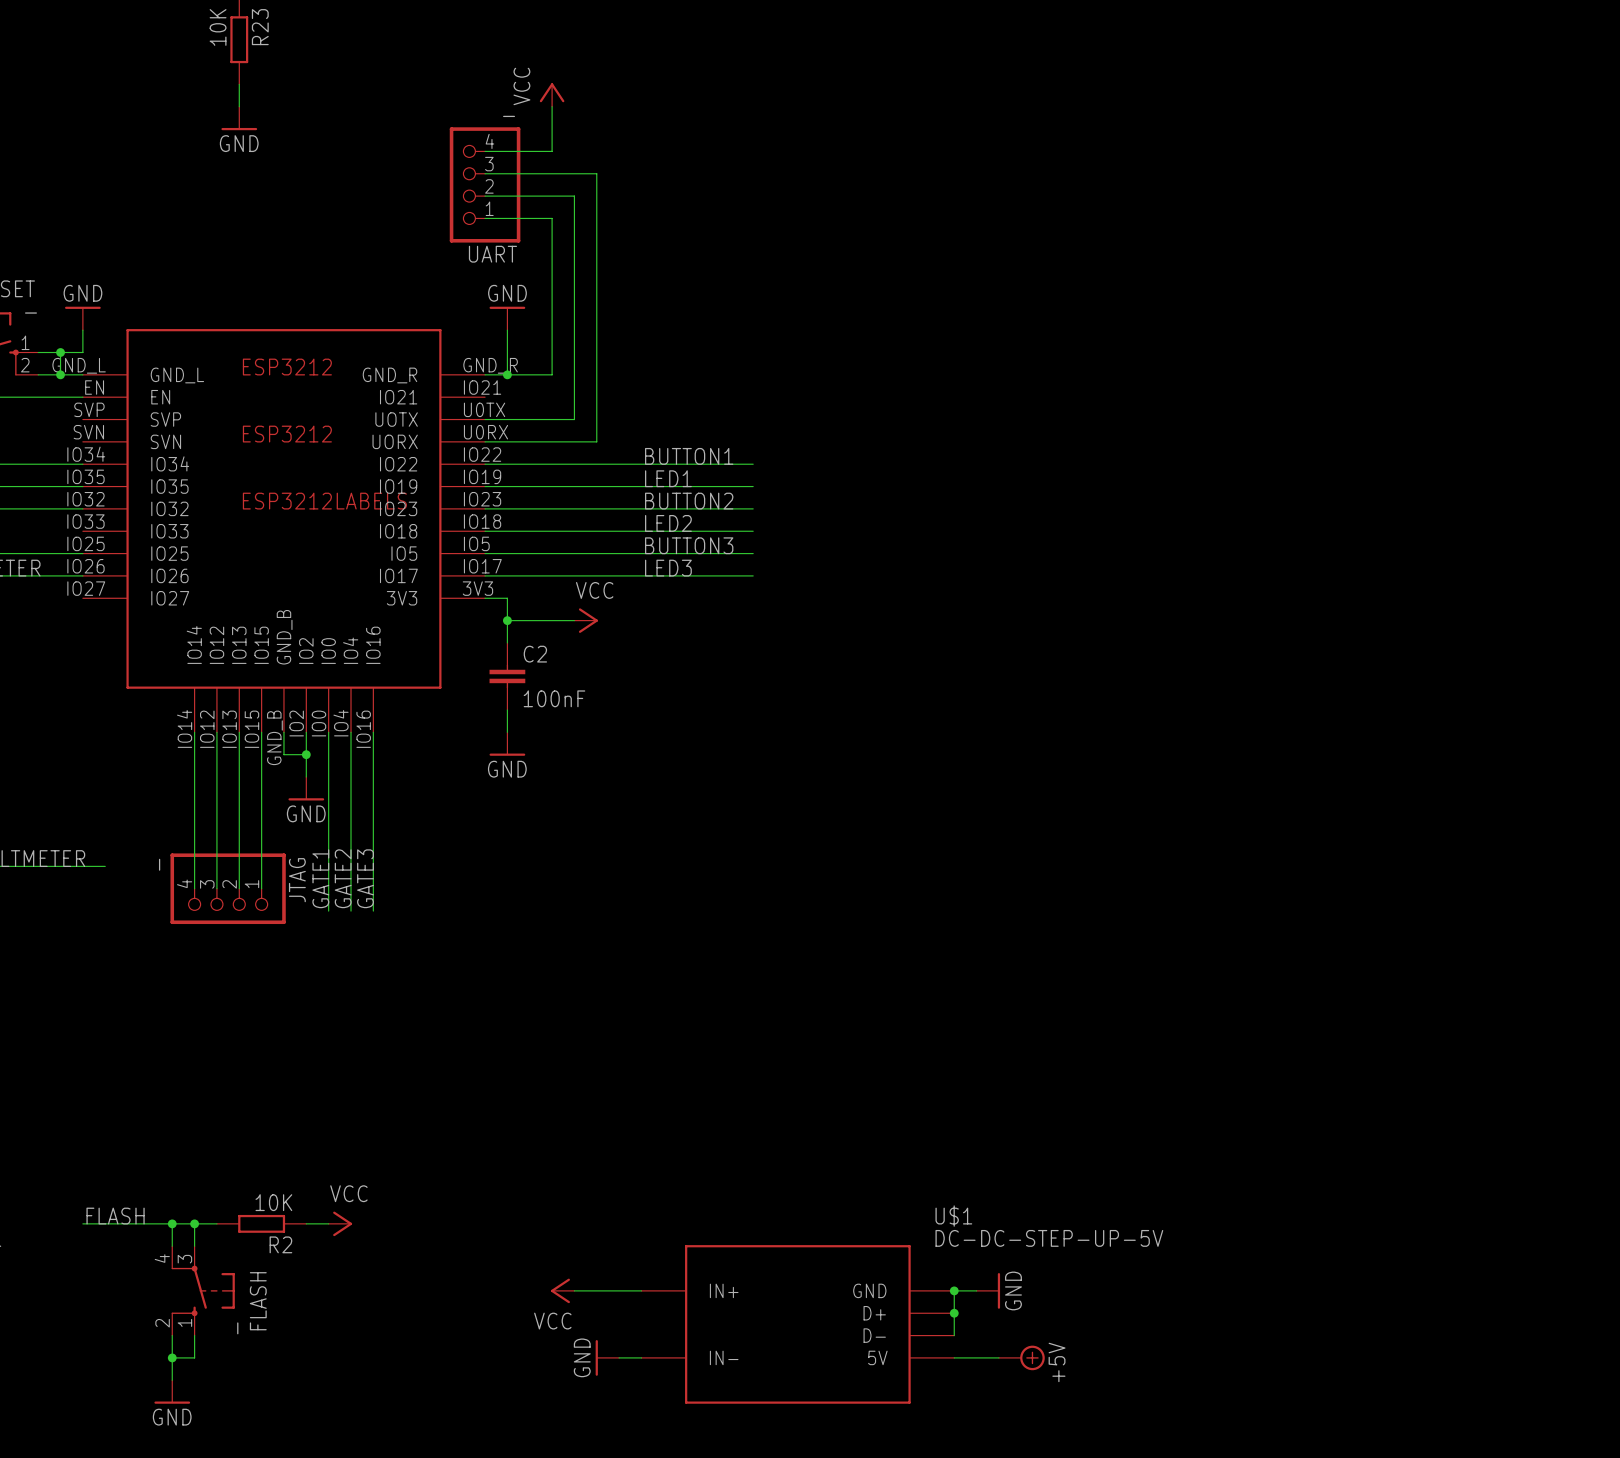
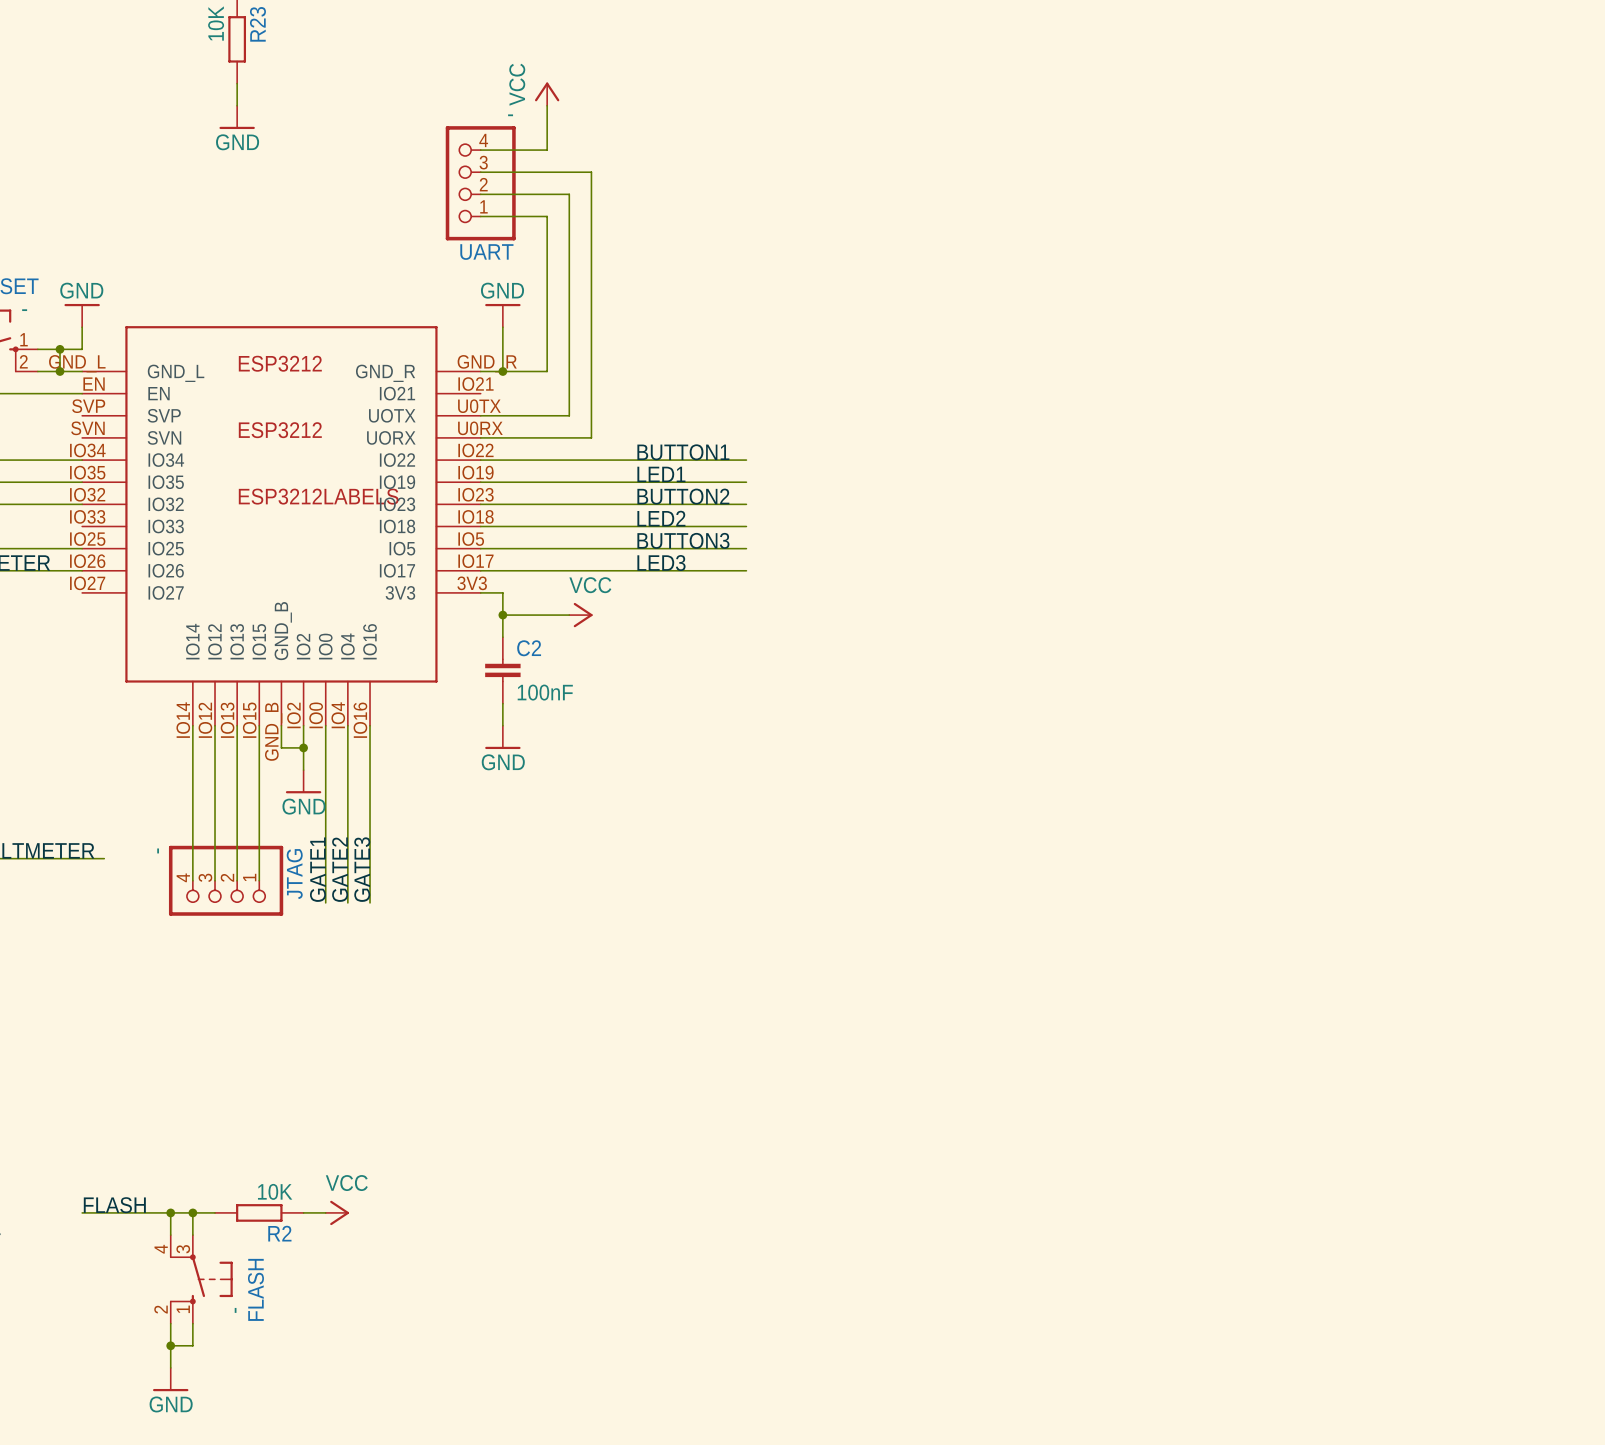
power symbol: VCC (562, 1290) -> none
wire: (574, 1290) (641, 1290) -> none
junction: (954, 1290) -> none
wire: (976, 1290) (954, 1290) (954, 1335) -> none
power symbol: GND (988, 1290) -> none
junction: (954, 1313) -> none
U$1: DC-DC-STEP-UP-5V (797, 1324) -> none
power symbol: GND (607, 1357) -> none
wire: (619, 1357) (641, 1357) -> none
wire: (954, 1357) (998, 1357) -> none
power symbol: +5V (1021, 1357) -> none

